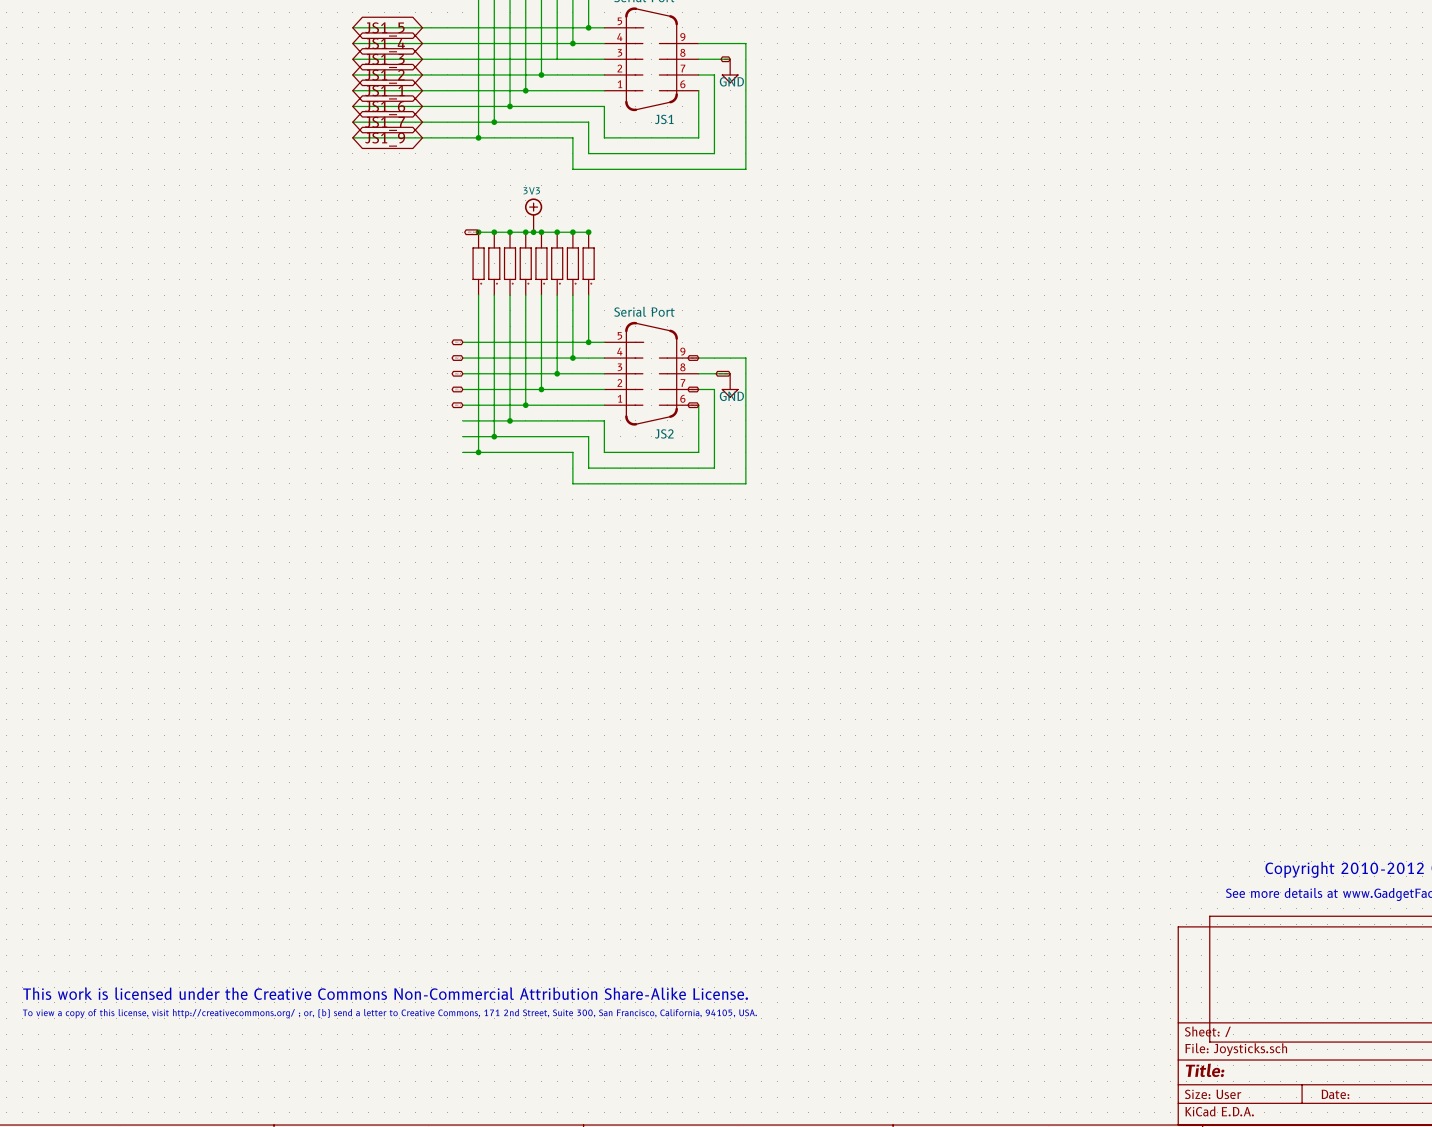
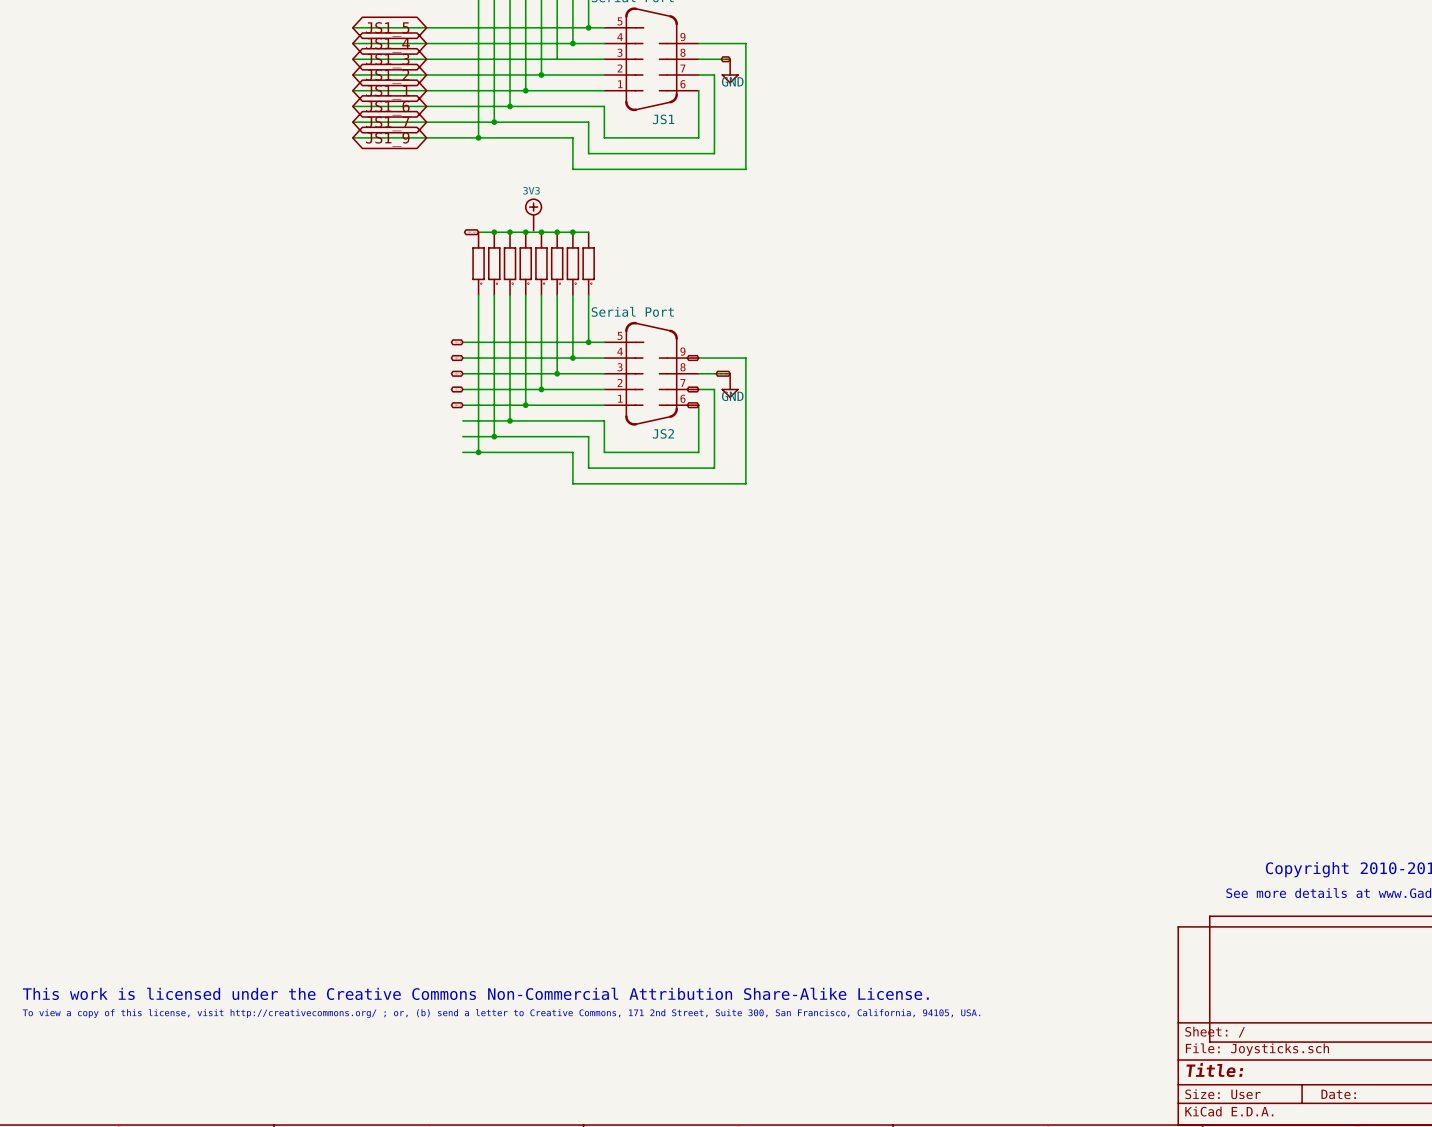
junction: (478, 232) -> none
junction: (533, 232) -> none
junction: (588, 232) -> none

